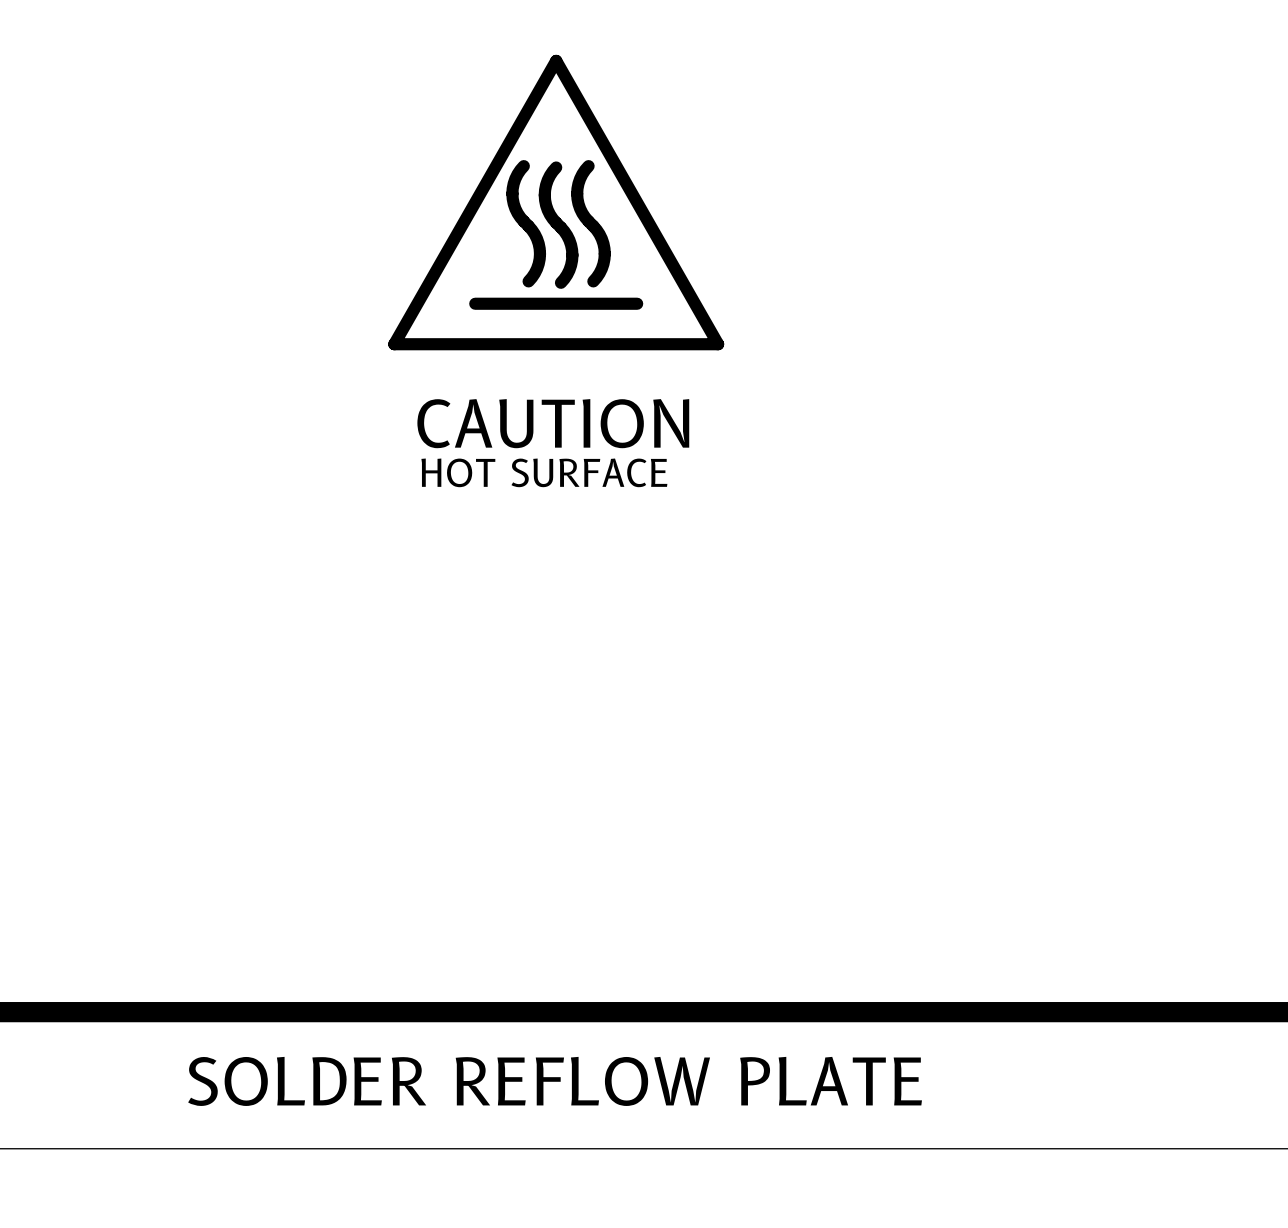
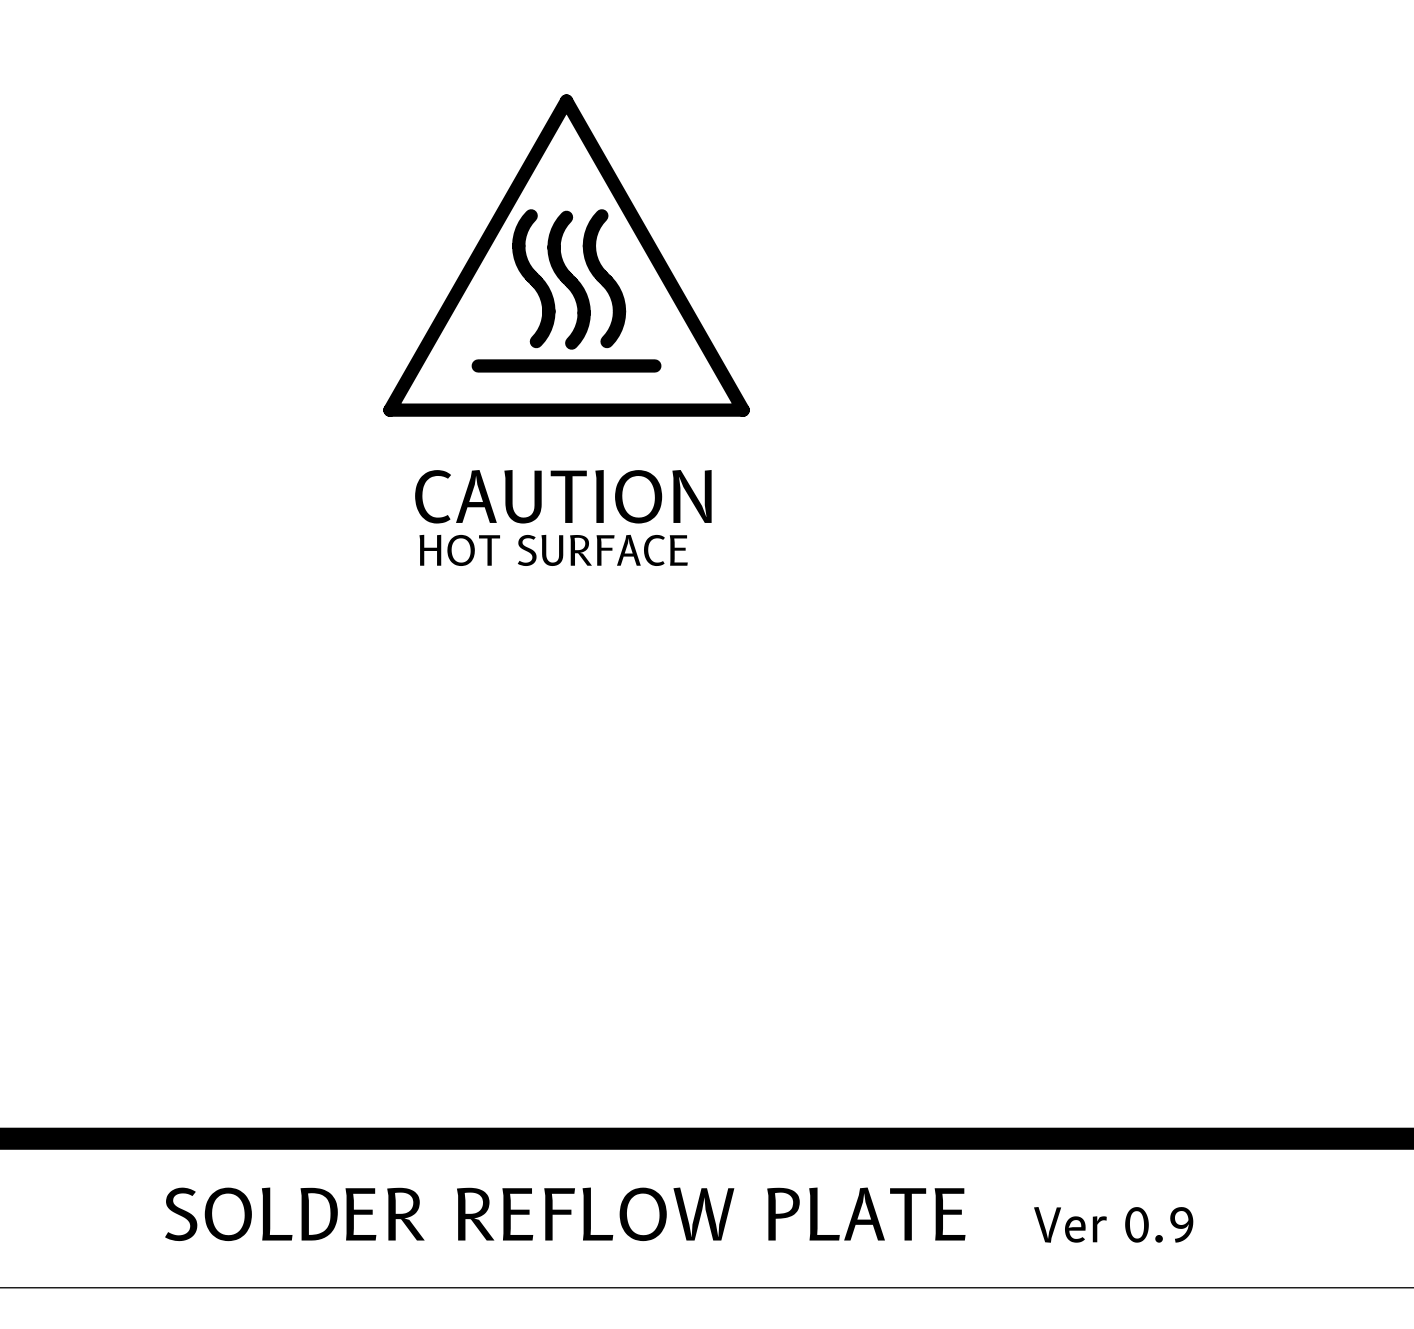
text: none -> Ver 0.9 (1113, 1224)

